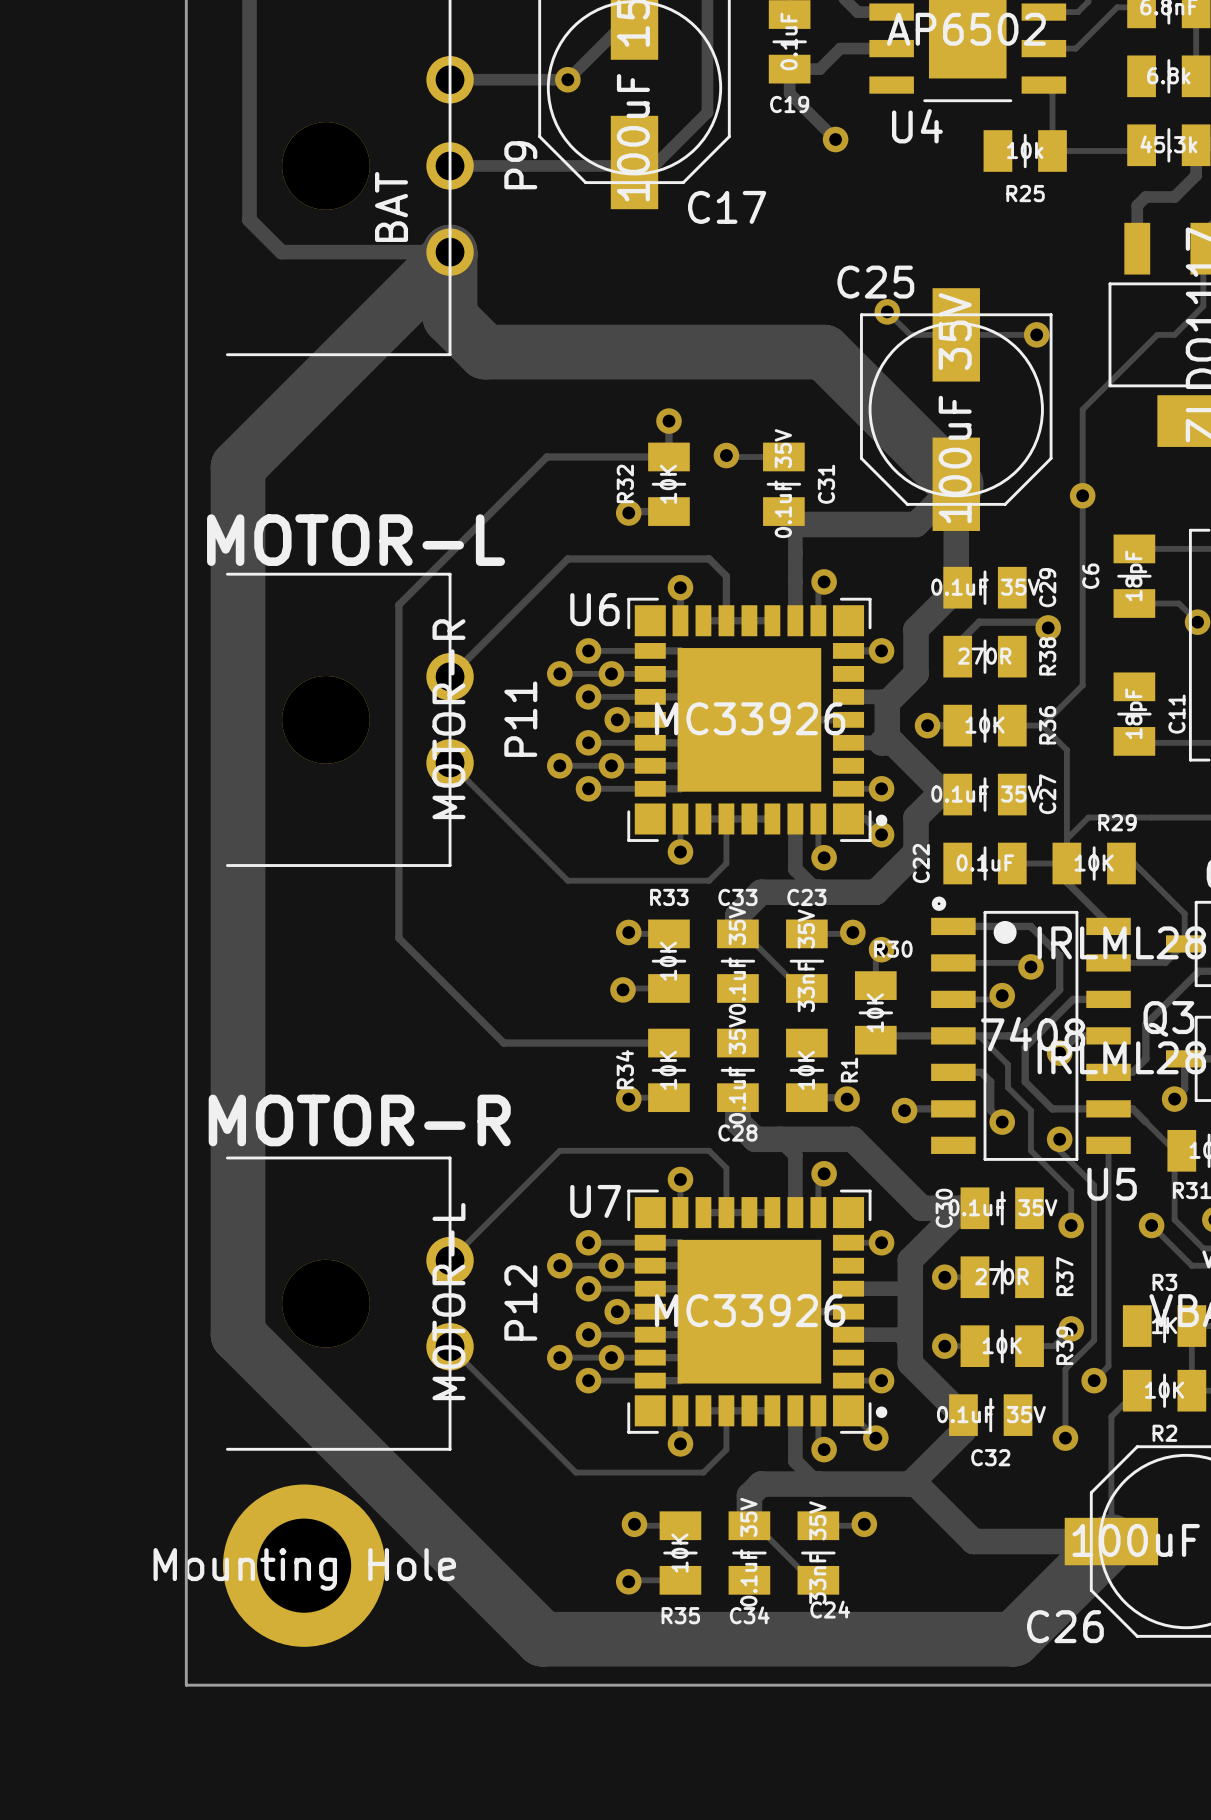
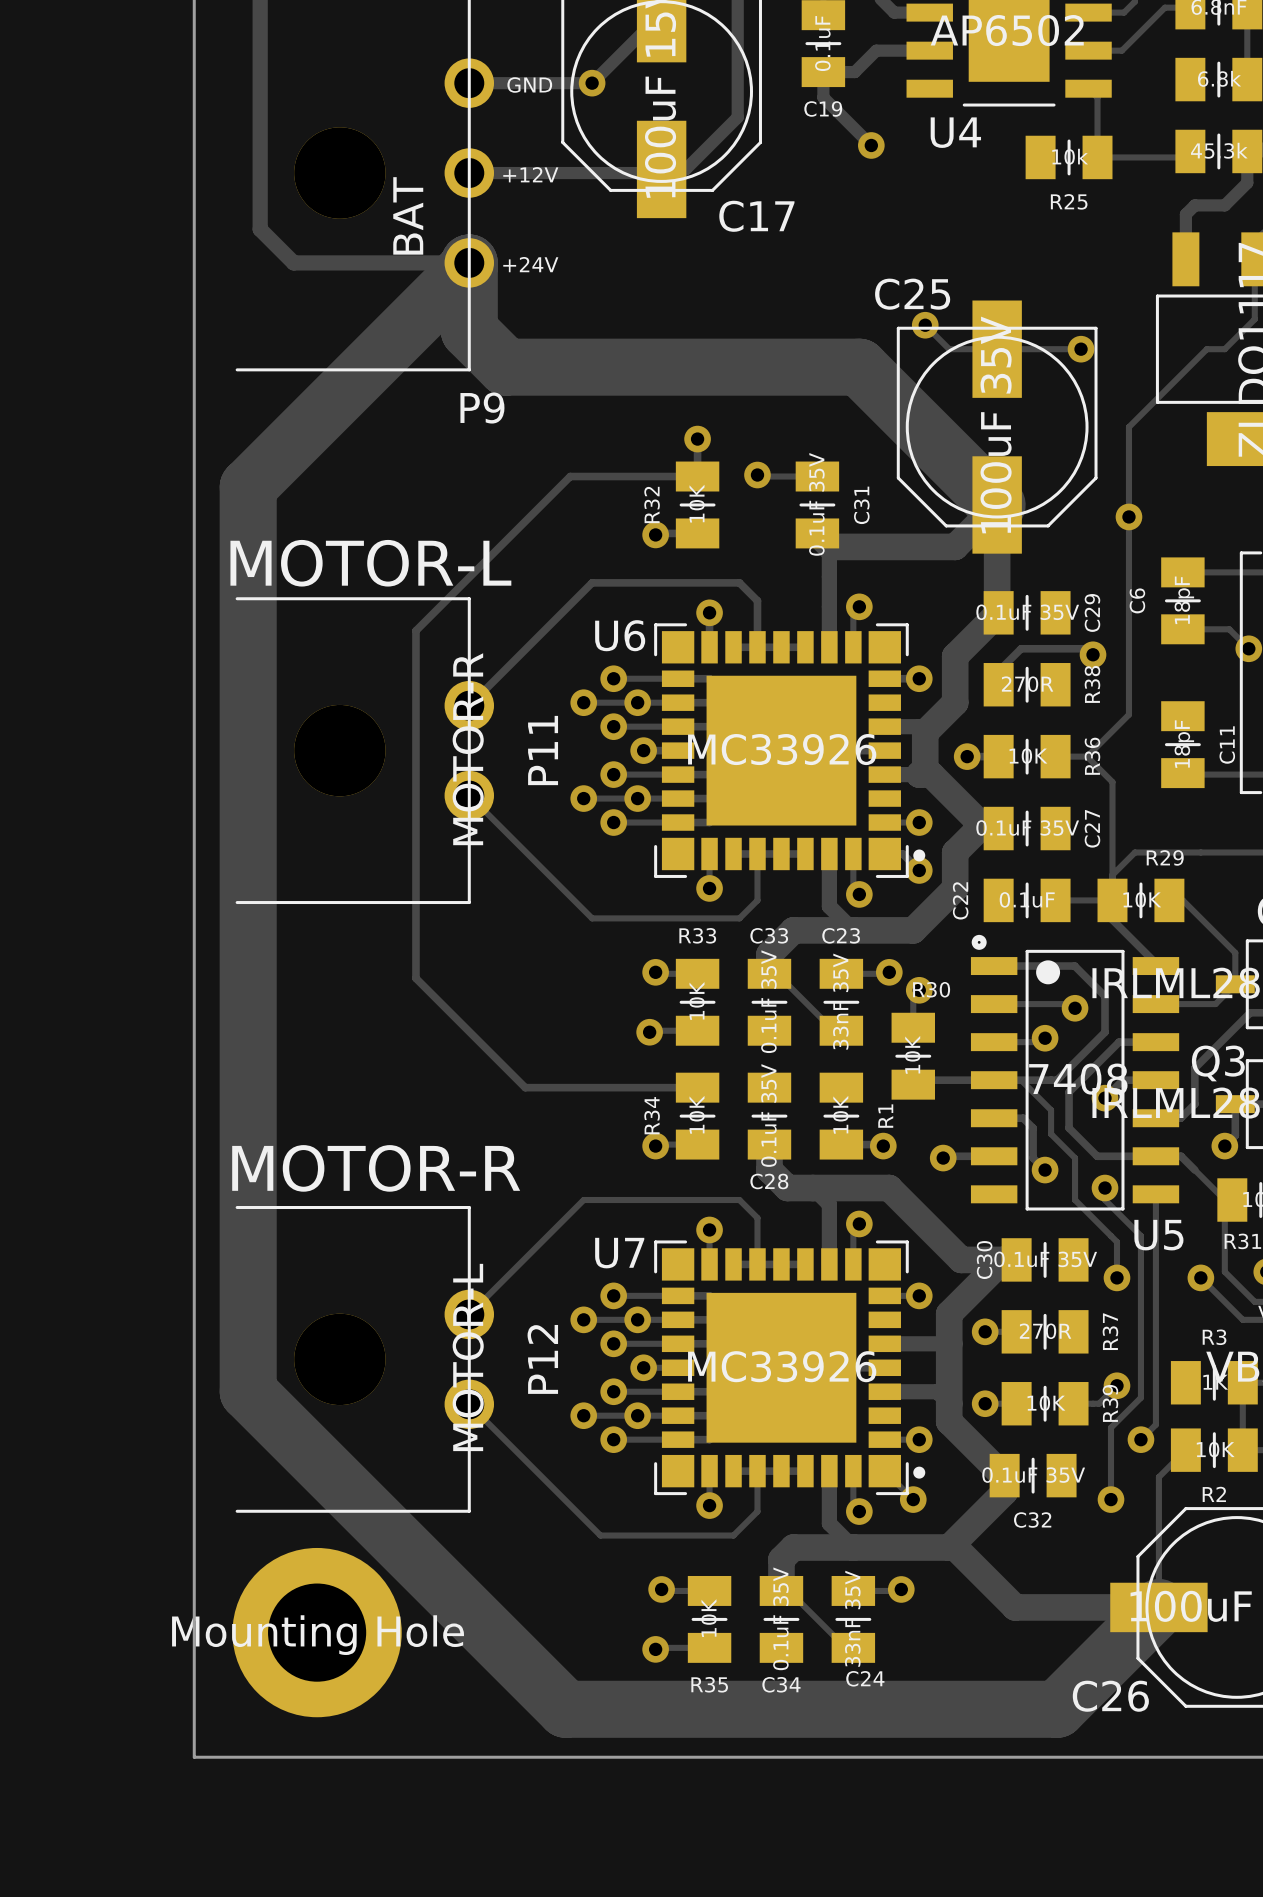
text: none -> GND (529, 85)
P9 name rotation: 0° (520, 165) -> 90° clockwise (482, 408)
P9 name position: P9 (520, 165) -> P9 (482, 408)
text: none -> +12V (530, 174)
text: none -> +24V (530, 264)

